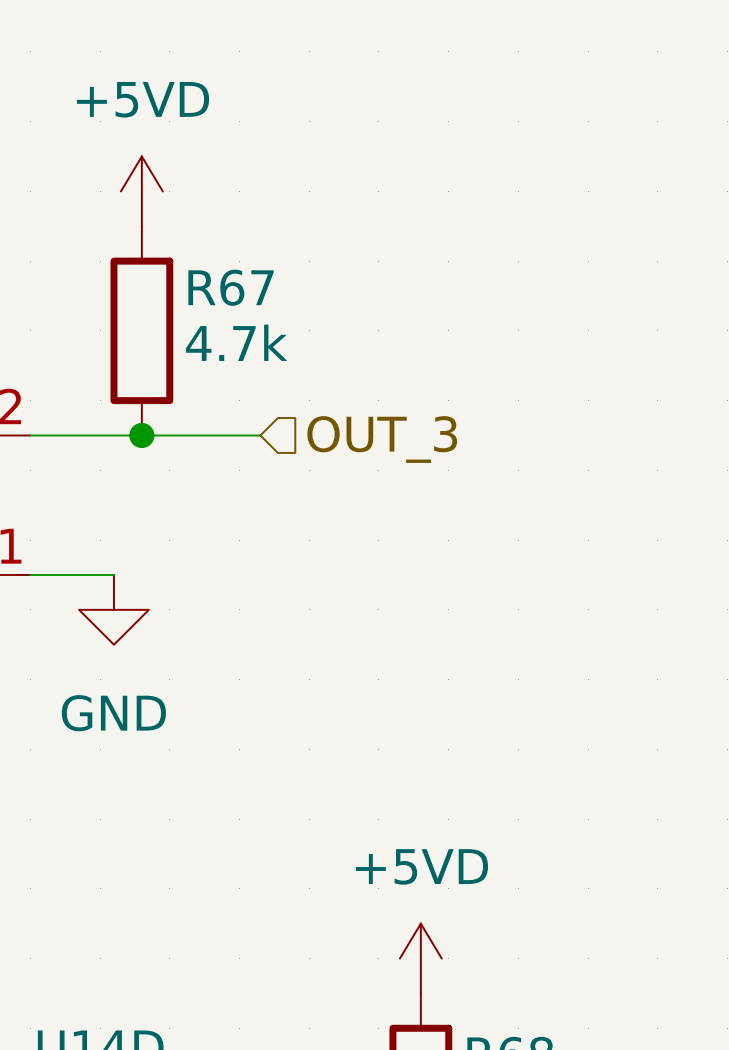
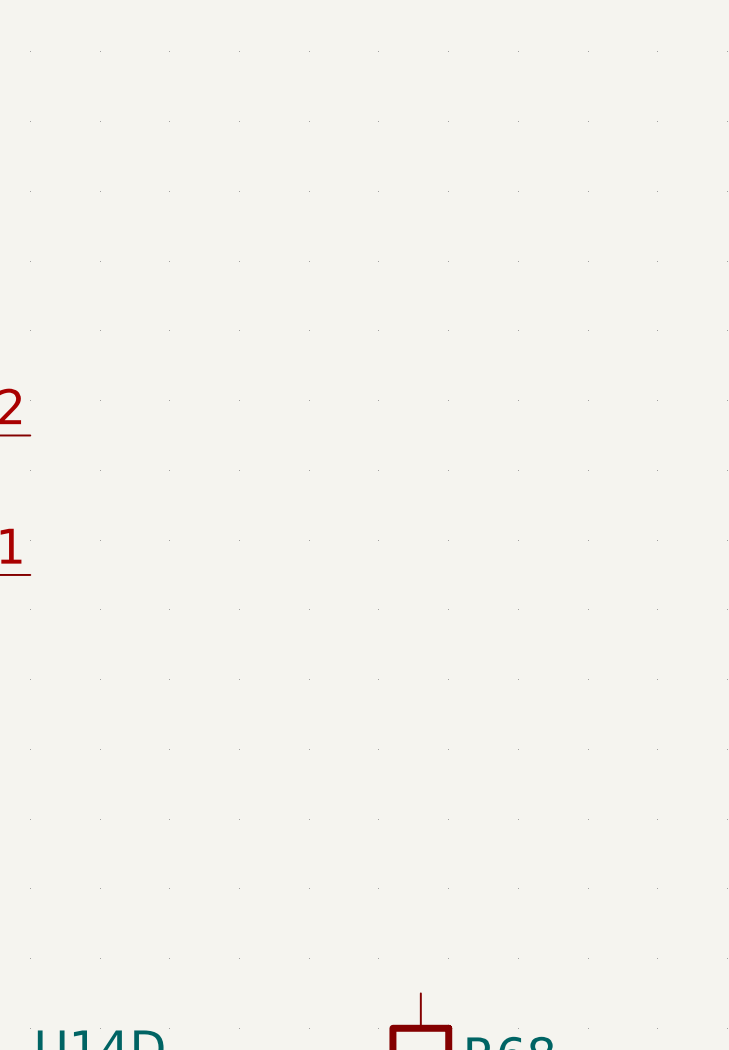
power symbol: +5VD (141, 191) -> none
R67: 4.7k (141, 330) -> none
wire: (30, 435) (260, 435) -> none
junction: (141, 435) -> none
hierarchical label: OUT_3 (382, 439) -> none
wire: (30, 574) (113, 574) -> none
power symbol: GND (113, 609) -> none
power symbol: +5VD (420, 958) -> none

